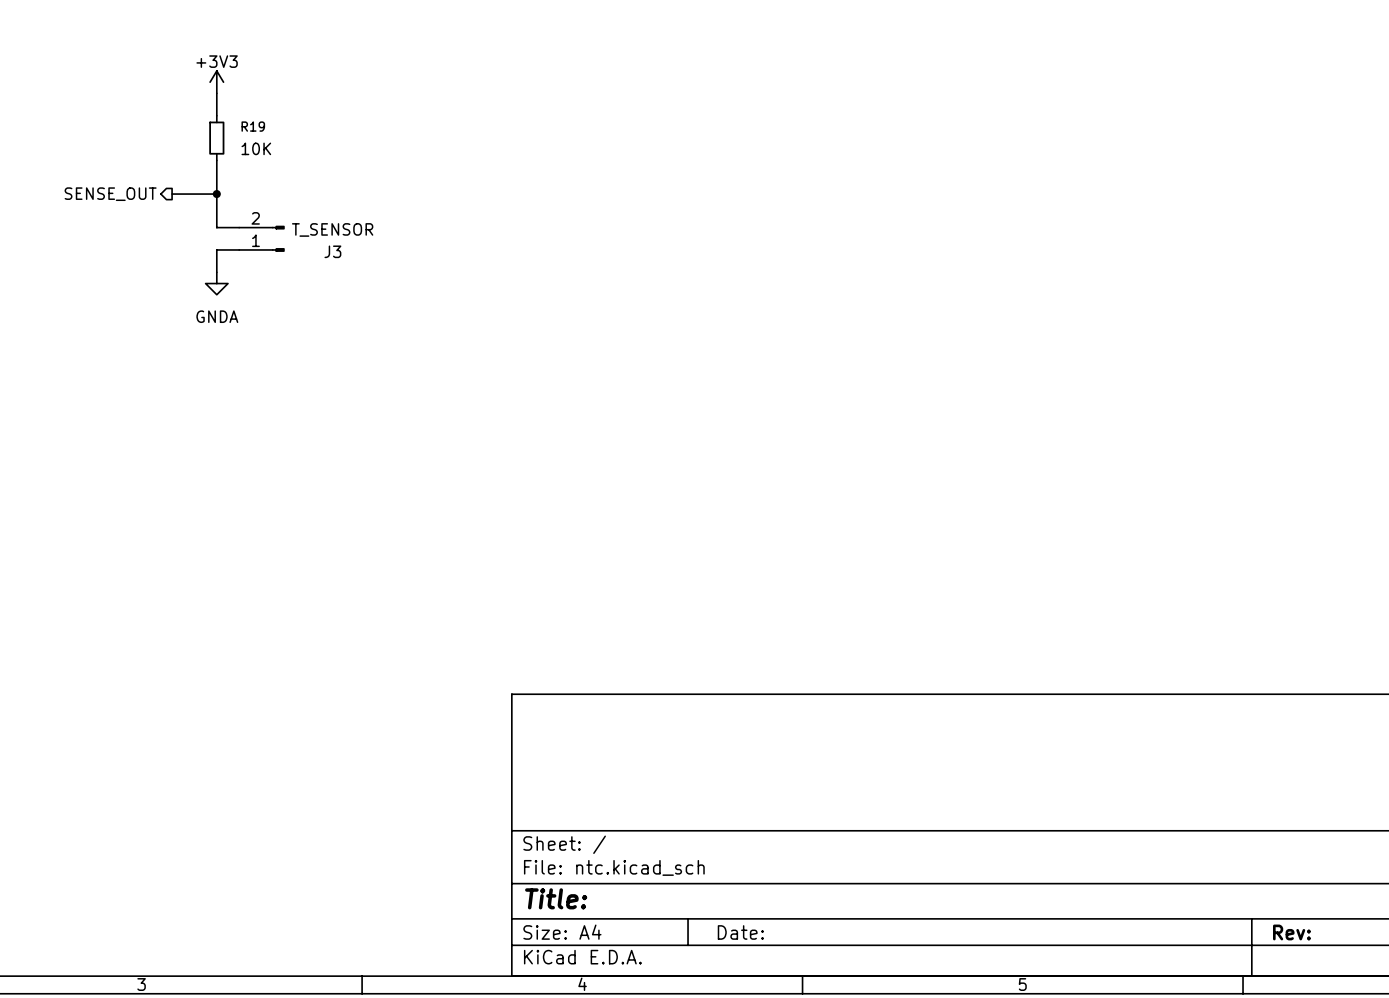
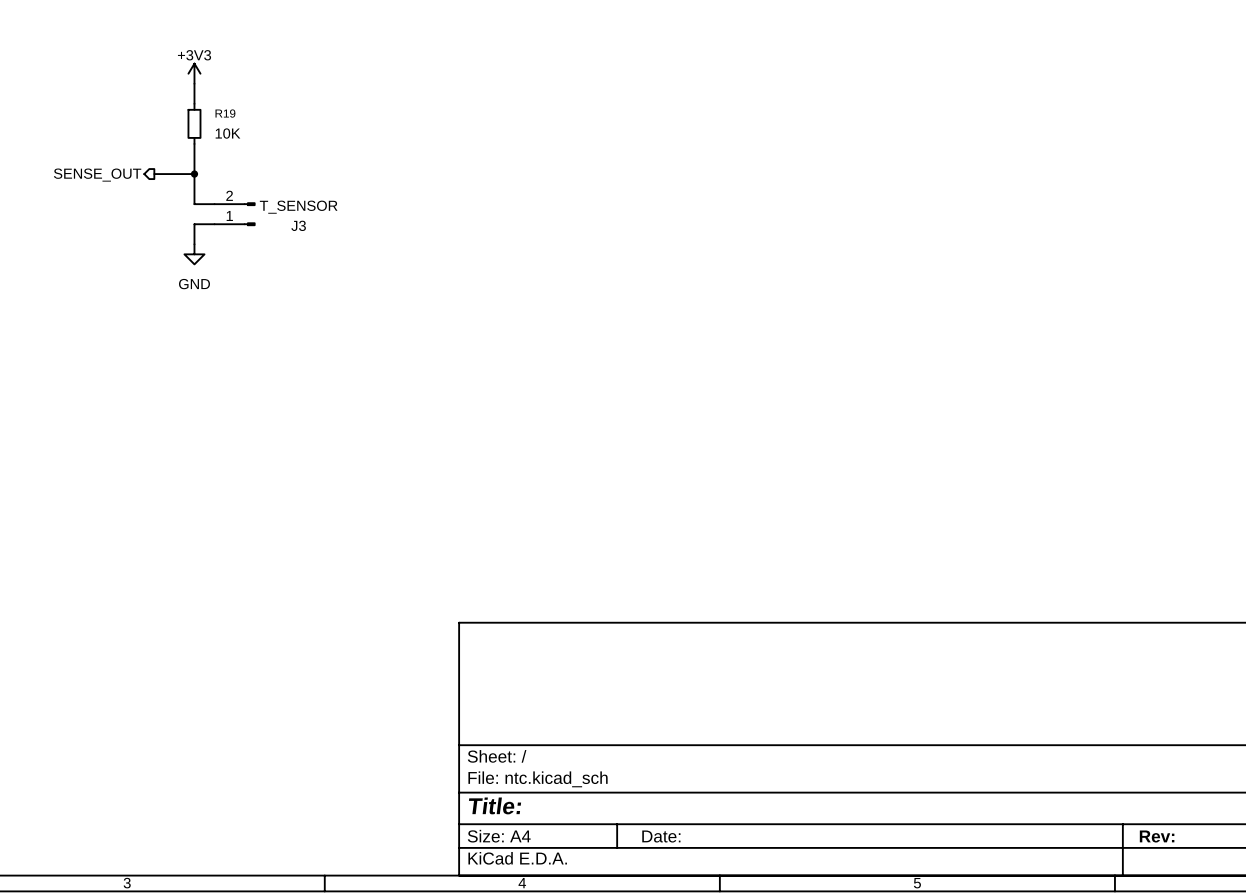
power symbol: GNDA (216, 283) -> GND (194, 254)

